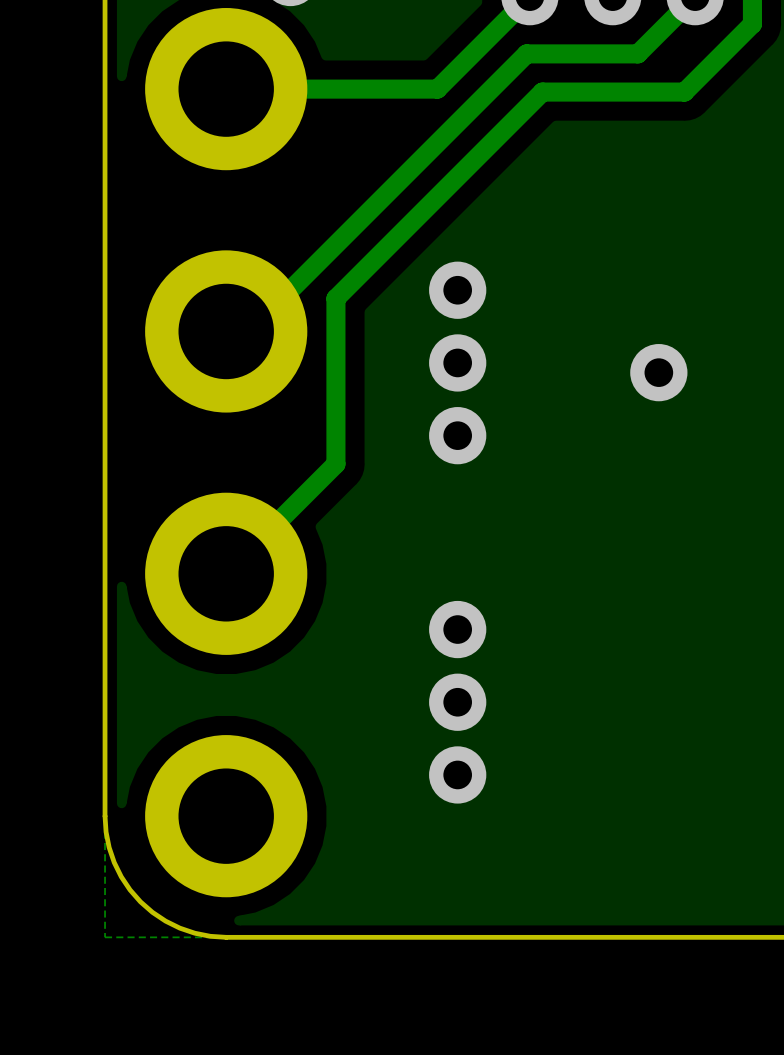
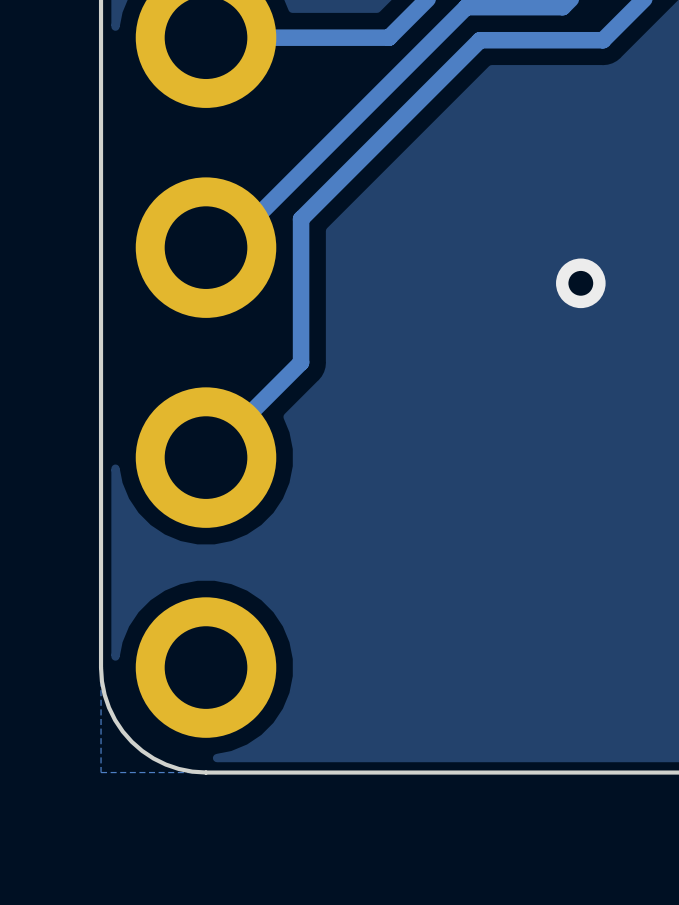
via: (457, 290) -> none
via: (457, 362) -> none
via: (457, 435) -> none
via: (457, 629) -> none
via: (457, 702) -> none
via: (457, 774) -> none

